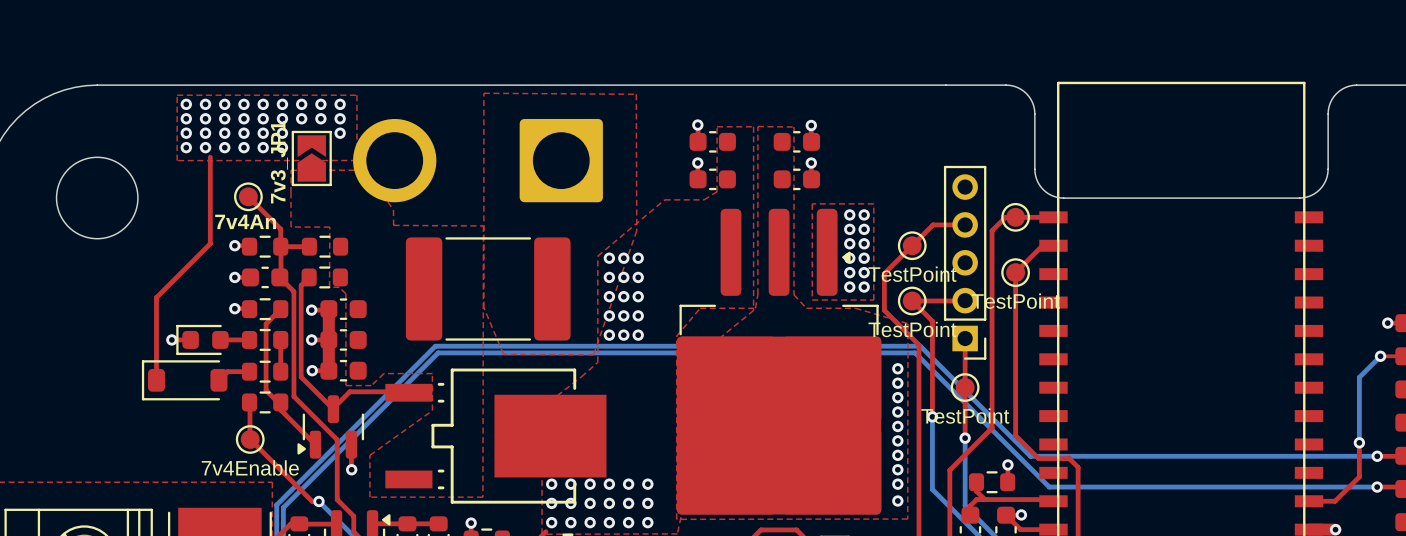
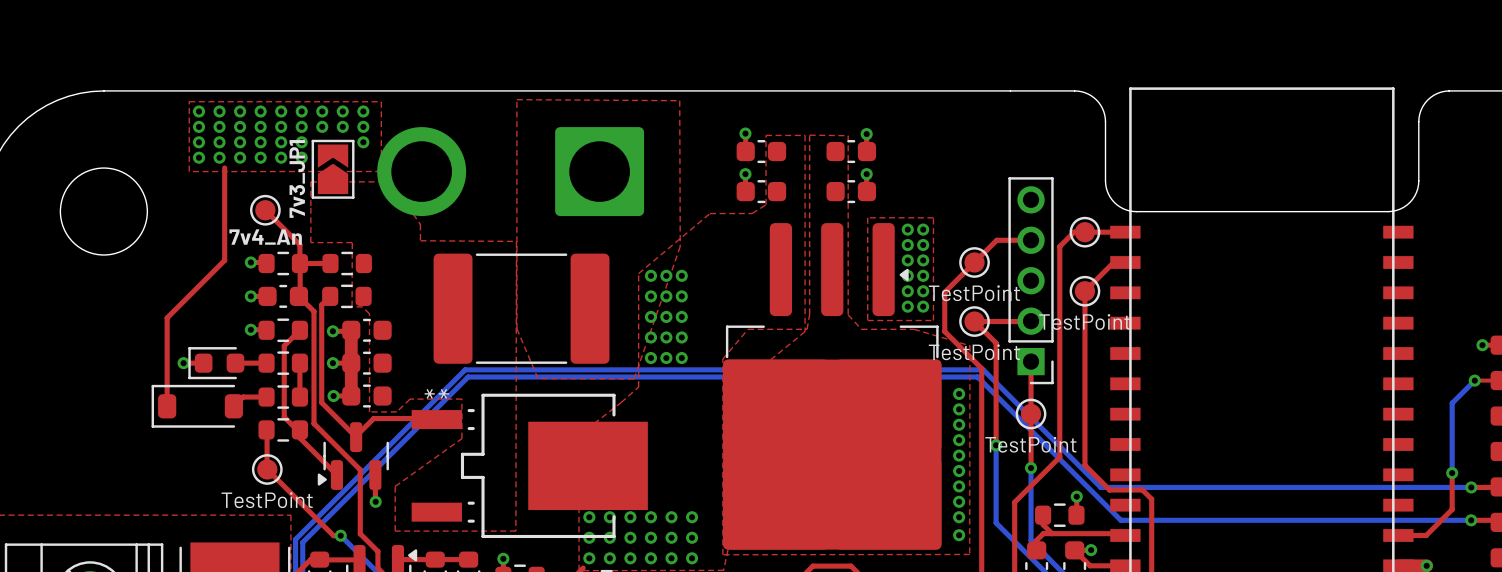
text: 7v4An (245, 221) -> 7v4_An (265, 237)
part footprint: [385, 368, 607, 504] -> [411, 393, 648, 539]
part value: 7v4Enable (250, 467) -> TestPoint (267, 500)

